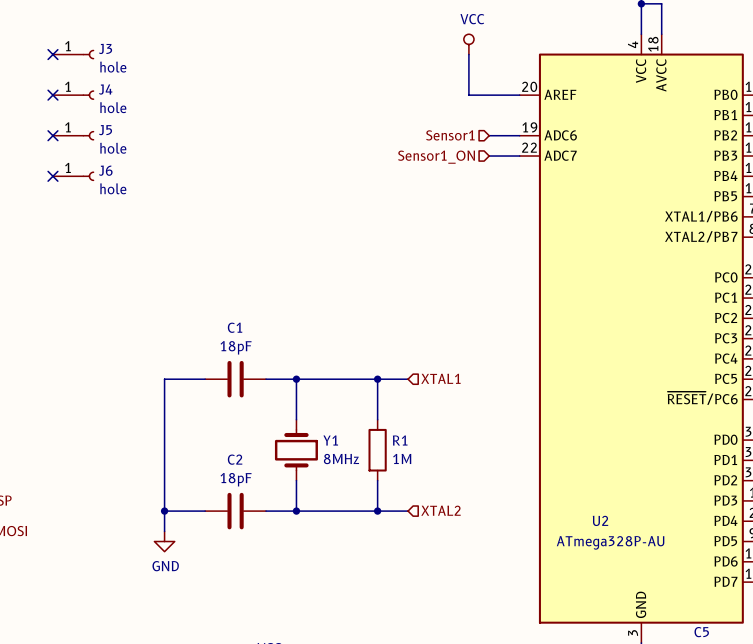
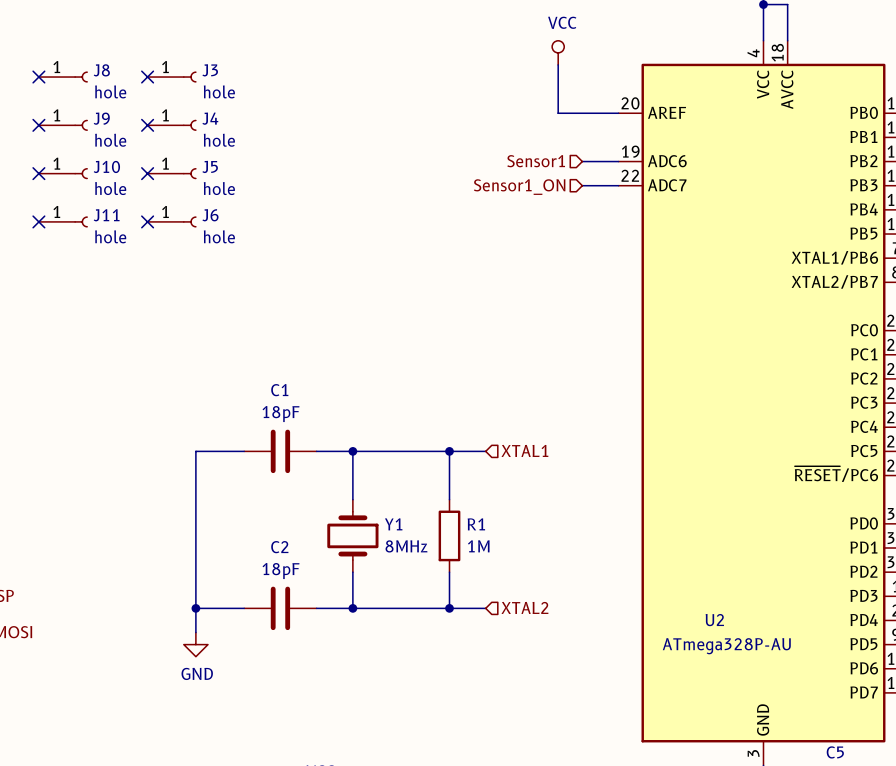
no-connect mark: (52, 54) -> none
J3 position: (73, 54) -> (172, 77)
no-connect mark: none -> (38, 77)
J8: none -> hole (63, 77)
no-connect mark: none -> (147, 77)
no-connect mark: (52, 95) -> none
J4 position: (73, 95) -> (172, 125)
no-connect mark: none -> (38, 125)
J9: none -> hole (63, 125)
no-connect mark: none -> (147, 125)
no-connect mark: (52, 135) -> none
J5 position: (73, 135) -> (172, 173)
no-connect mark: none -> (38, 173)
J10: none -> hole (63, 173)
no-connect mark: none -> (147, 173)
no-connect mark: (52, 176) -> none
J6 position: (73, 176) -> (172, 221)
no-connect mark: none -> (38, 221)
J11: none -> hole (63, 221)
no-connect mark: none -> (147, 221)

